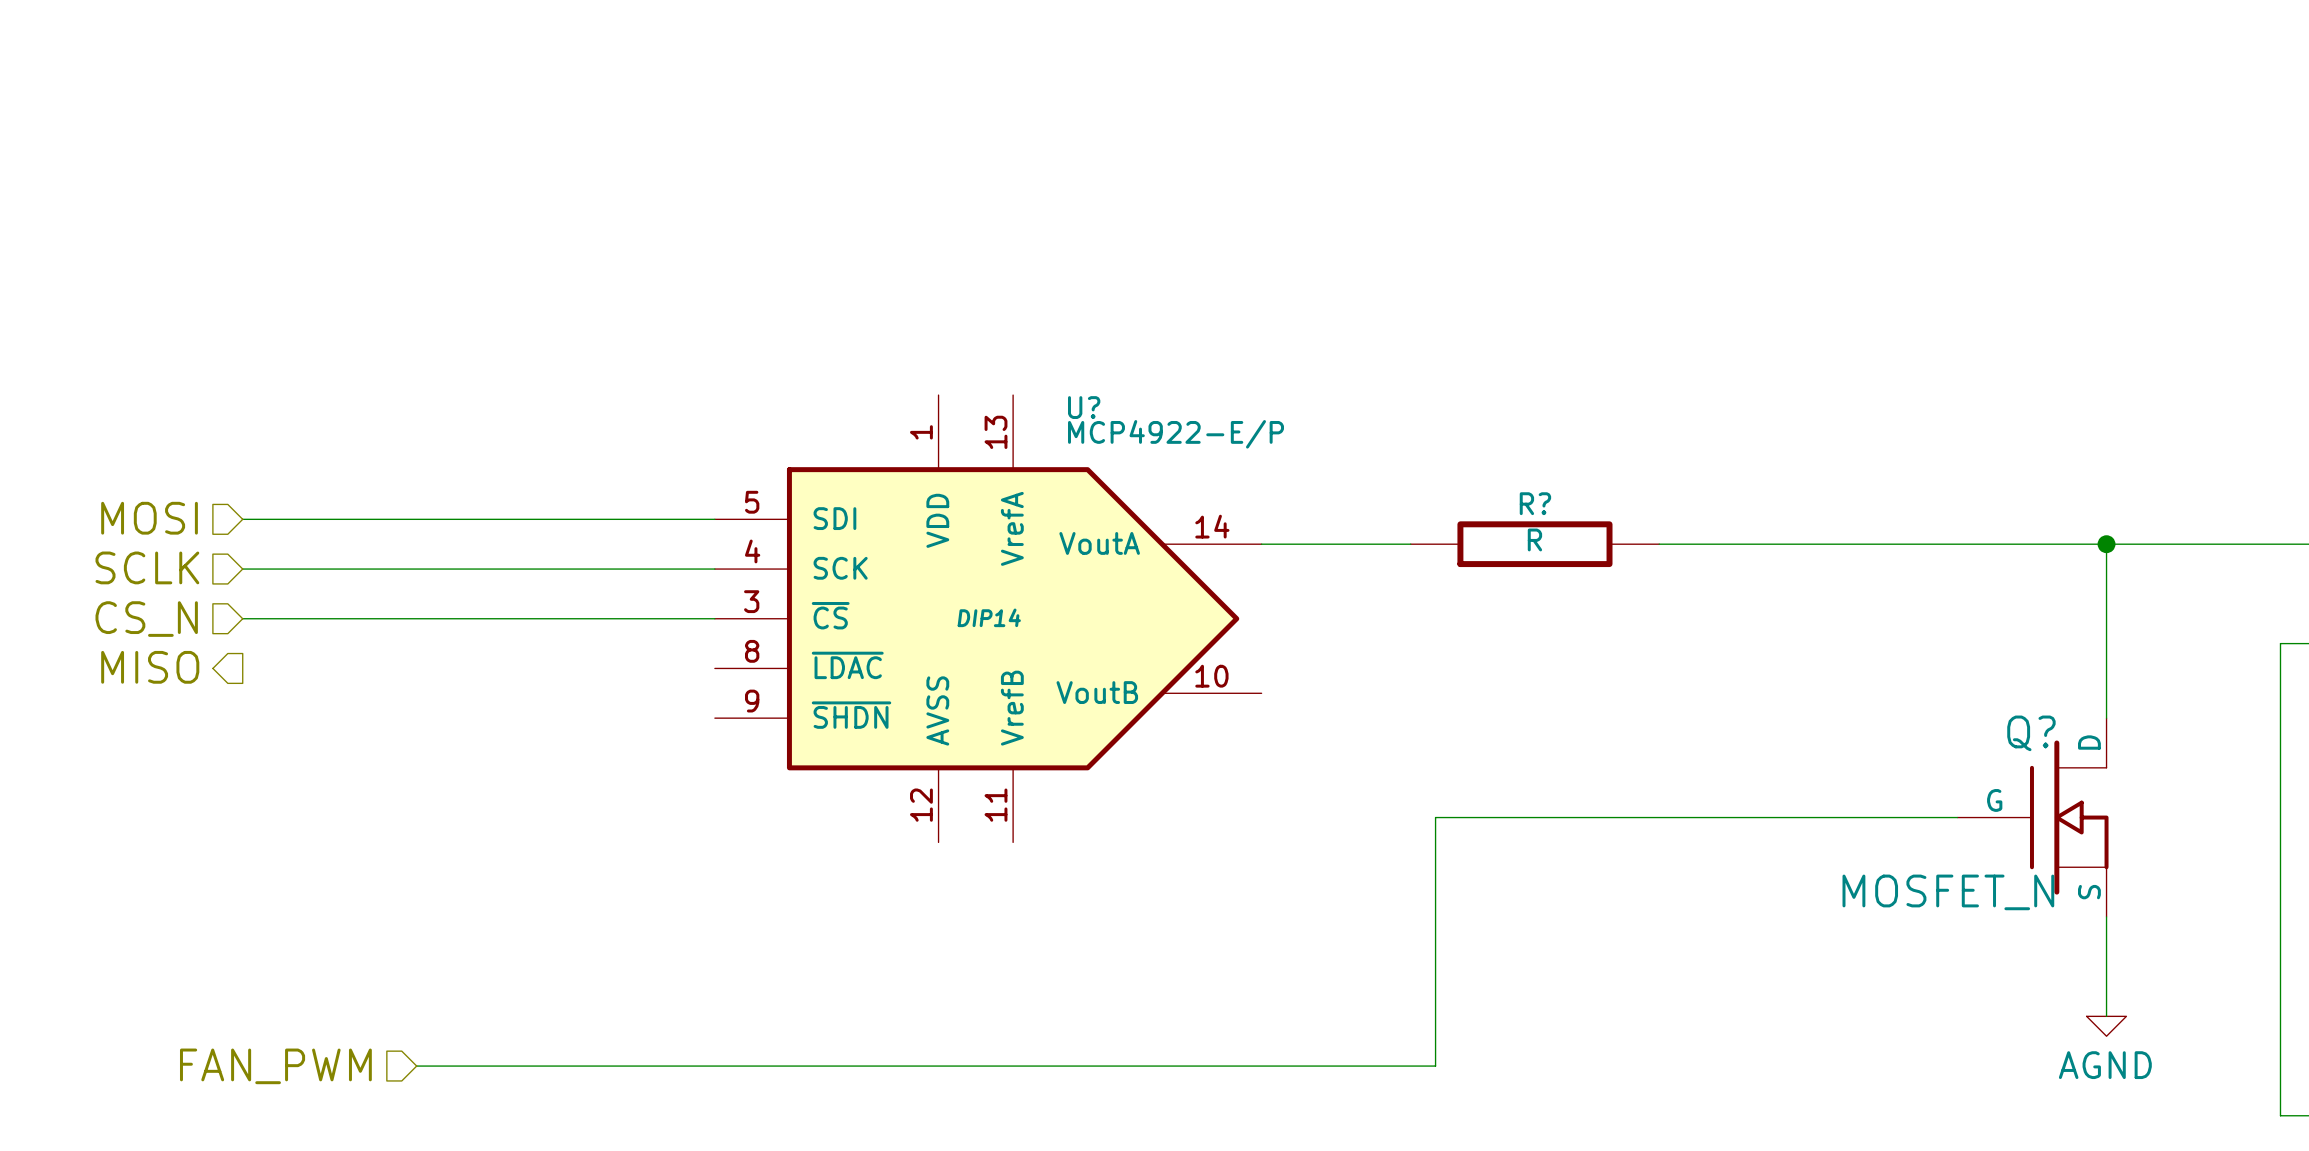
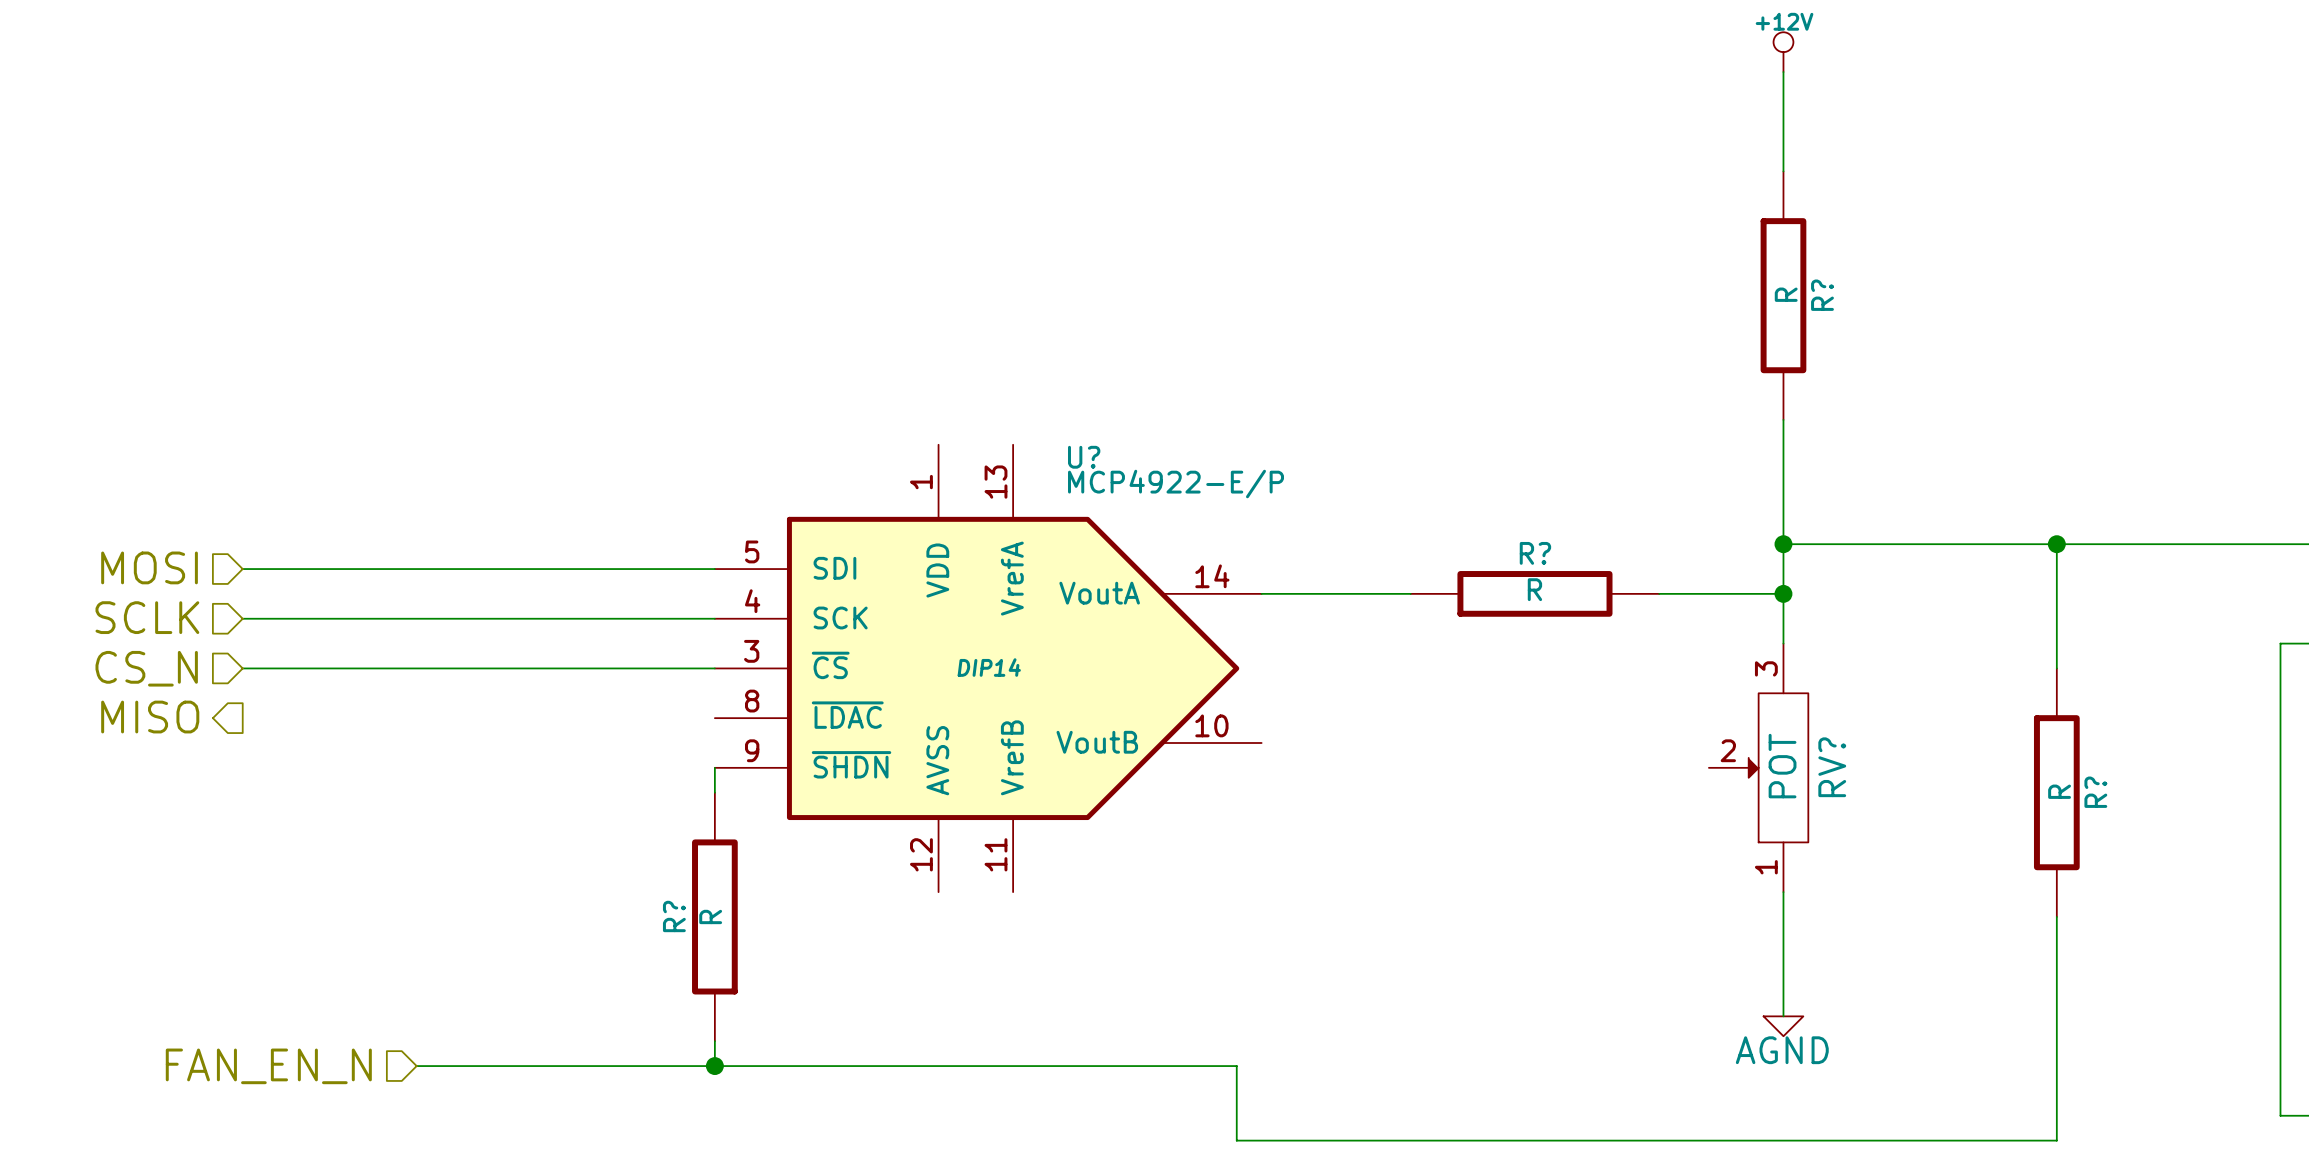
power symbol: none -> +12V (1783, 52)
wire: none -> (1783, 72) (1783, 171)
R?: none -> R (1783, 295)
wire: none -> (1783, 419) (1783, 643)
hierarchical label: MOSI (149, 518) -> none
wire: (242, 519) (714, 519) -> (242, 668) (714, 668)
wire: (1261, 544) (1410, 544) -> (1261, 593) (1410, 593)
R? position: (1534, 544) -> (1534, 593)
wire: (1659, 544) (1783, 544) -> (1659, 593) (1783, 593)
junction: none -> (1783, 544)
wire: none -> (2056, 544) (2056, 668)
wire: (2106, 544) (2106, 718) -> none
junction position: (2106, 544) -> (2056, 544)
hierarchical label: SCLK (147, 567) -> MOSI (149, 567)
junction: none -> (1783, 593)
U? position: (988, 618) -> (988, 668)
hierarchical label: CS_N (146, 619) -> SCLK (147, 617)
hierarchical label shape: output (150, 667) -> input (146, 668)
hierarchical label: MISO (150, 667) -> CS_N (146, 668)
hierarchical label: none -> MISO (150, 717)
wire: none -> (714, 767) (714, 792)
RV?: none -> POT (1758, 767)
R?: none -> R (2056, 792)
wire: (1957, 817) (1435, 817) (1435, 1066) (1236, 1066) -> (2056, 916) (2056, 1140) (1236, 1140) (1236, 1066)
Q?: MOSFET_N (2032, 817) -> none
wire: none -> (1783, 892) (1783, 1016)
R?: none -> R (714, 916)
wire: (2106, 916) (2106, 1016) -> none
power symbol position: AGND (2106, 1026) -> AGND (1783, 1026)
wire: none -> (714, 1041) (714, 1066)
power symbol text position: AGND (2105, 1065) -> AGND (1782, 1050)
hierarchical label: FAN_PWM (275, 1066) -> FAN_EN_N (268, 1066)
junction: none -> (714, 1066)

